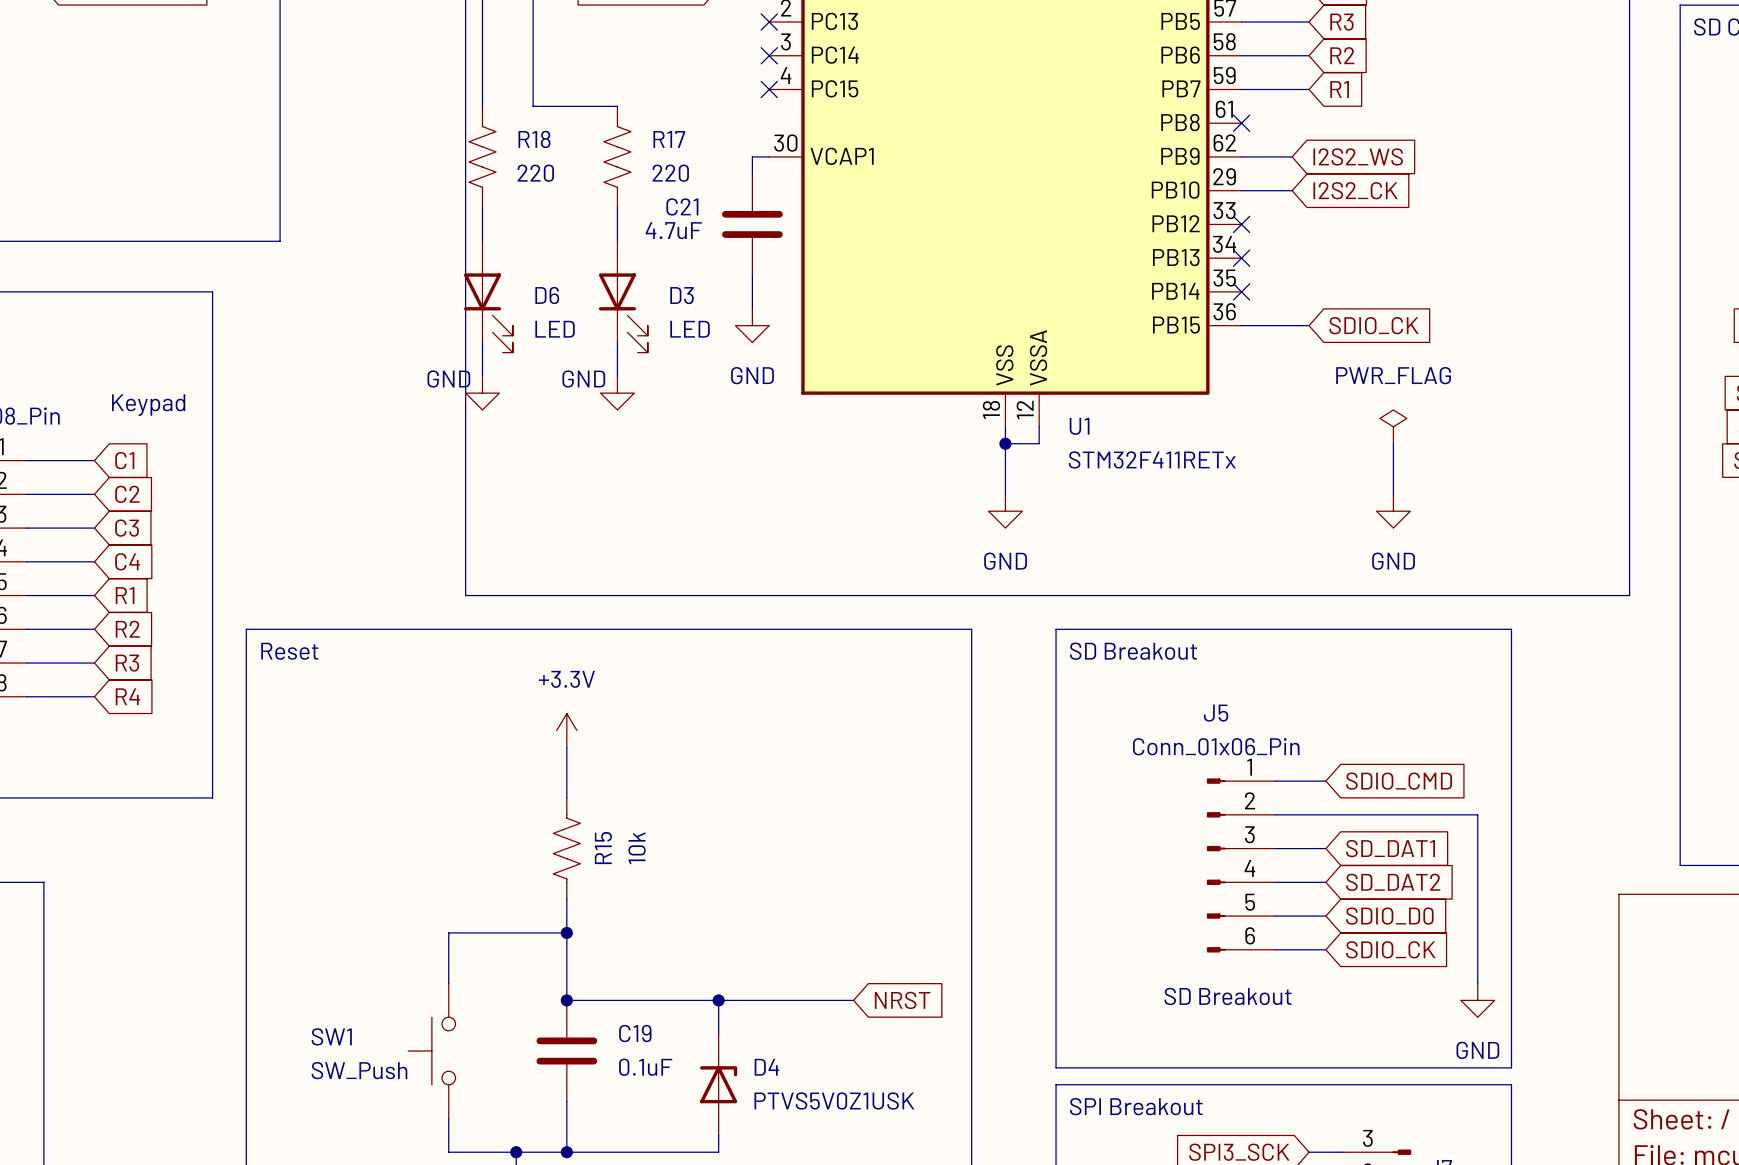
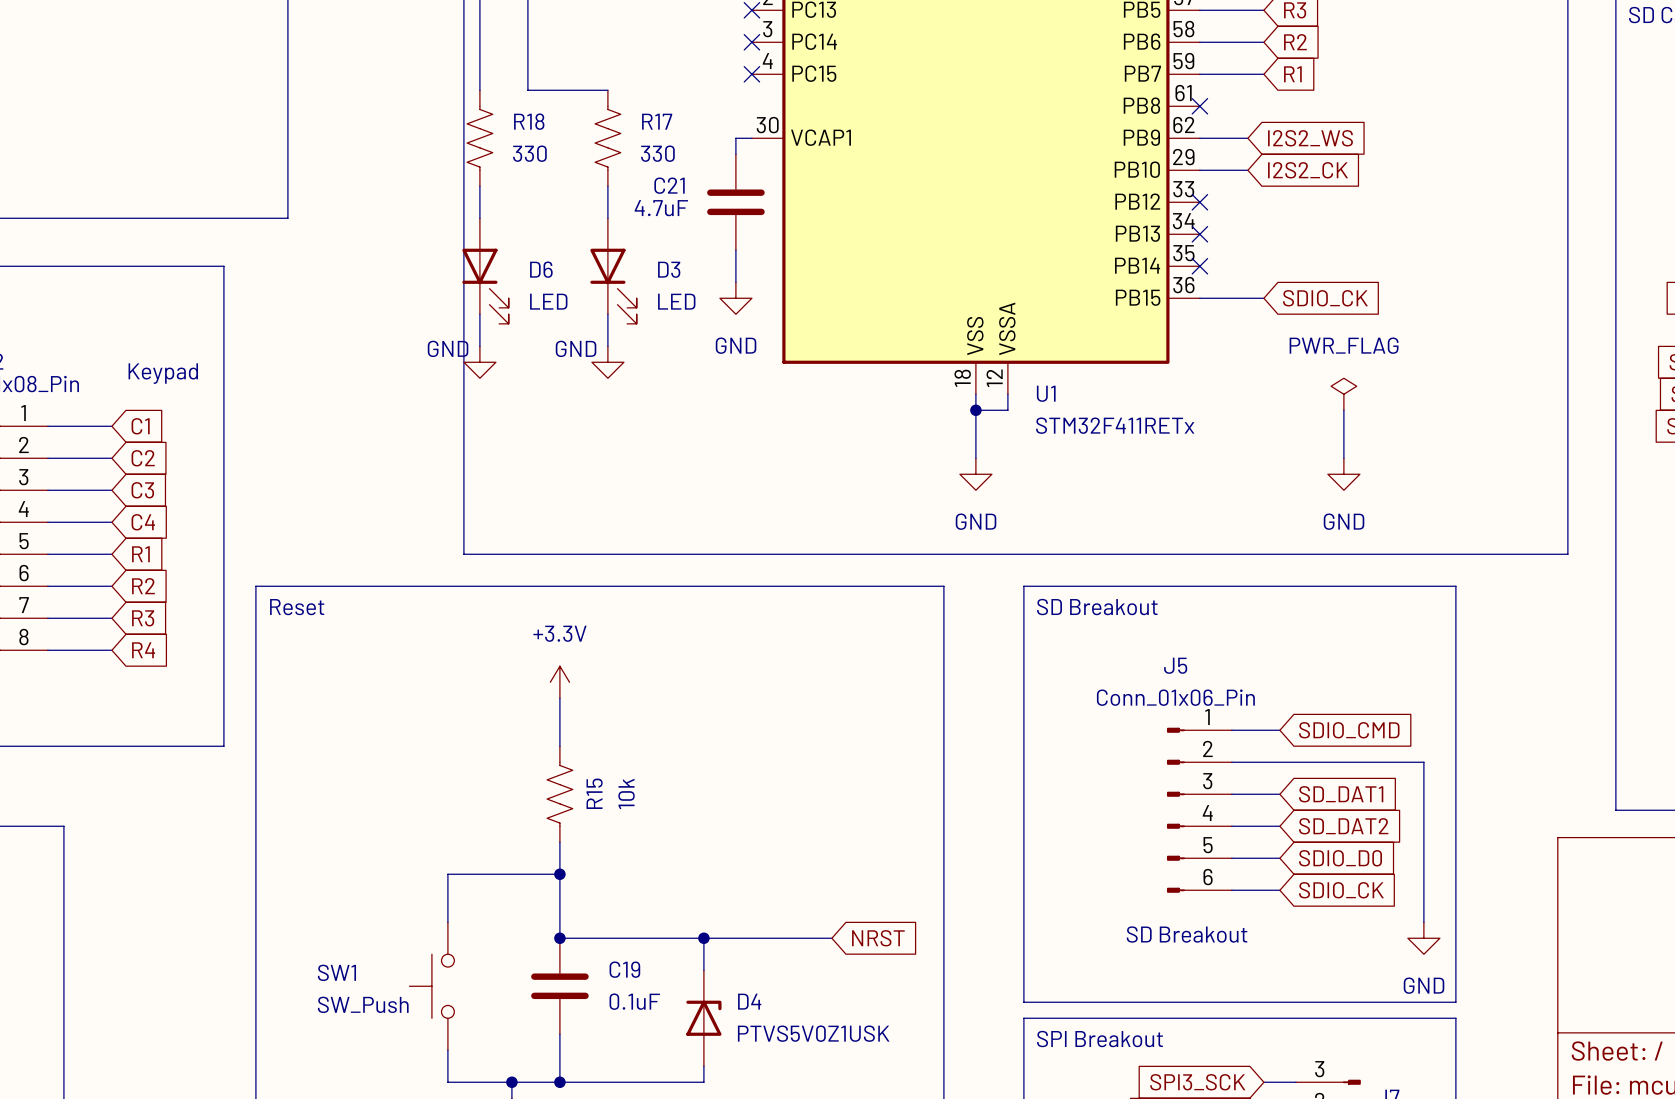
R18 value: 220 (535, 173) -> 330 (529, 153)
R17 value: 220 (670, 173) -> 330 (657, 153)

